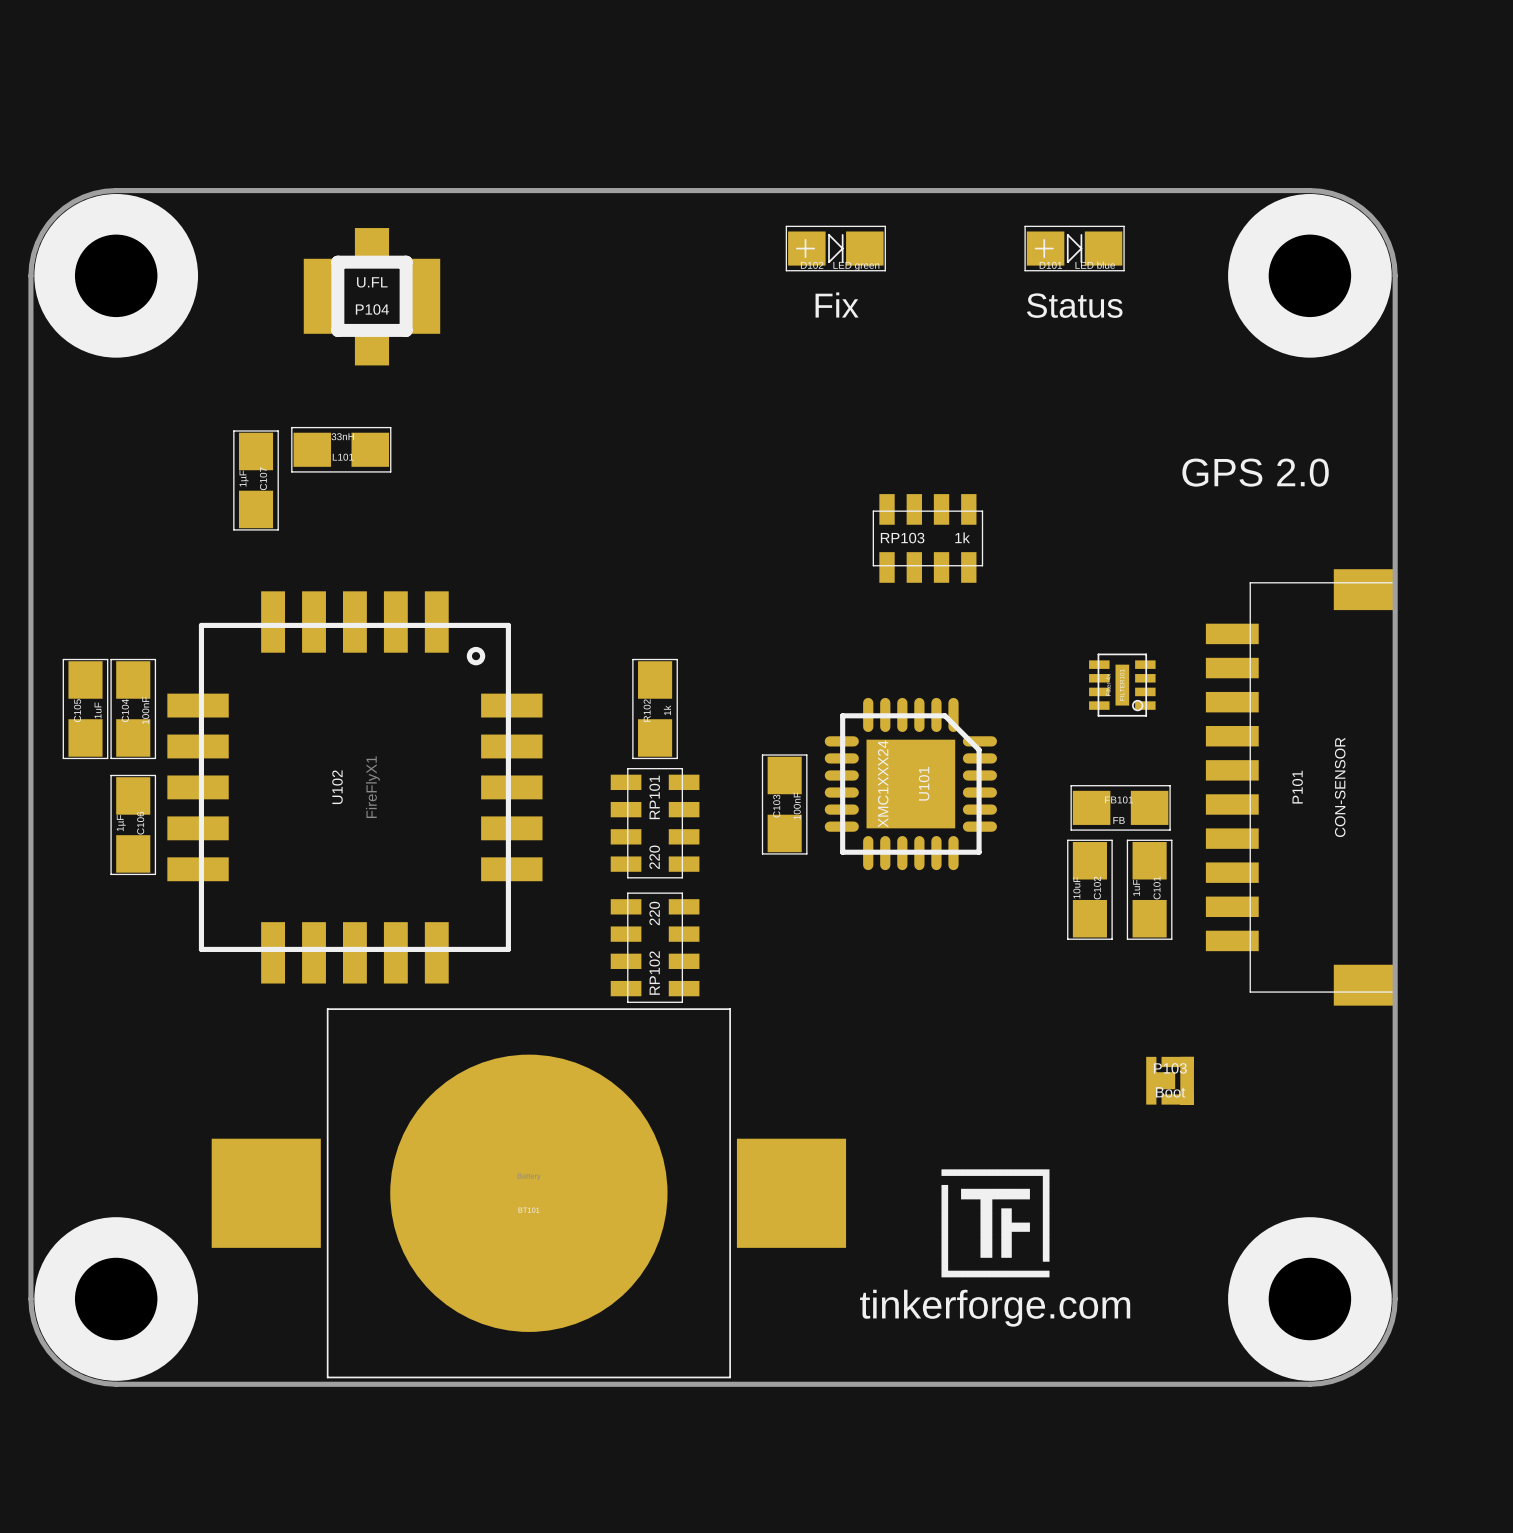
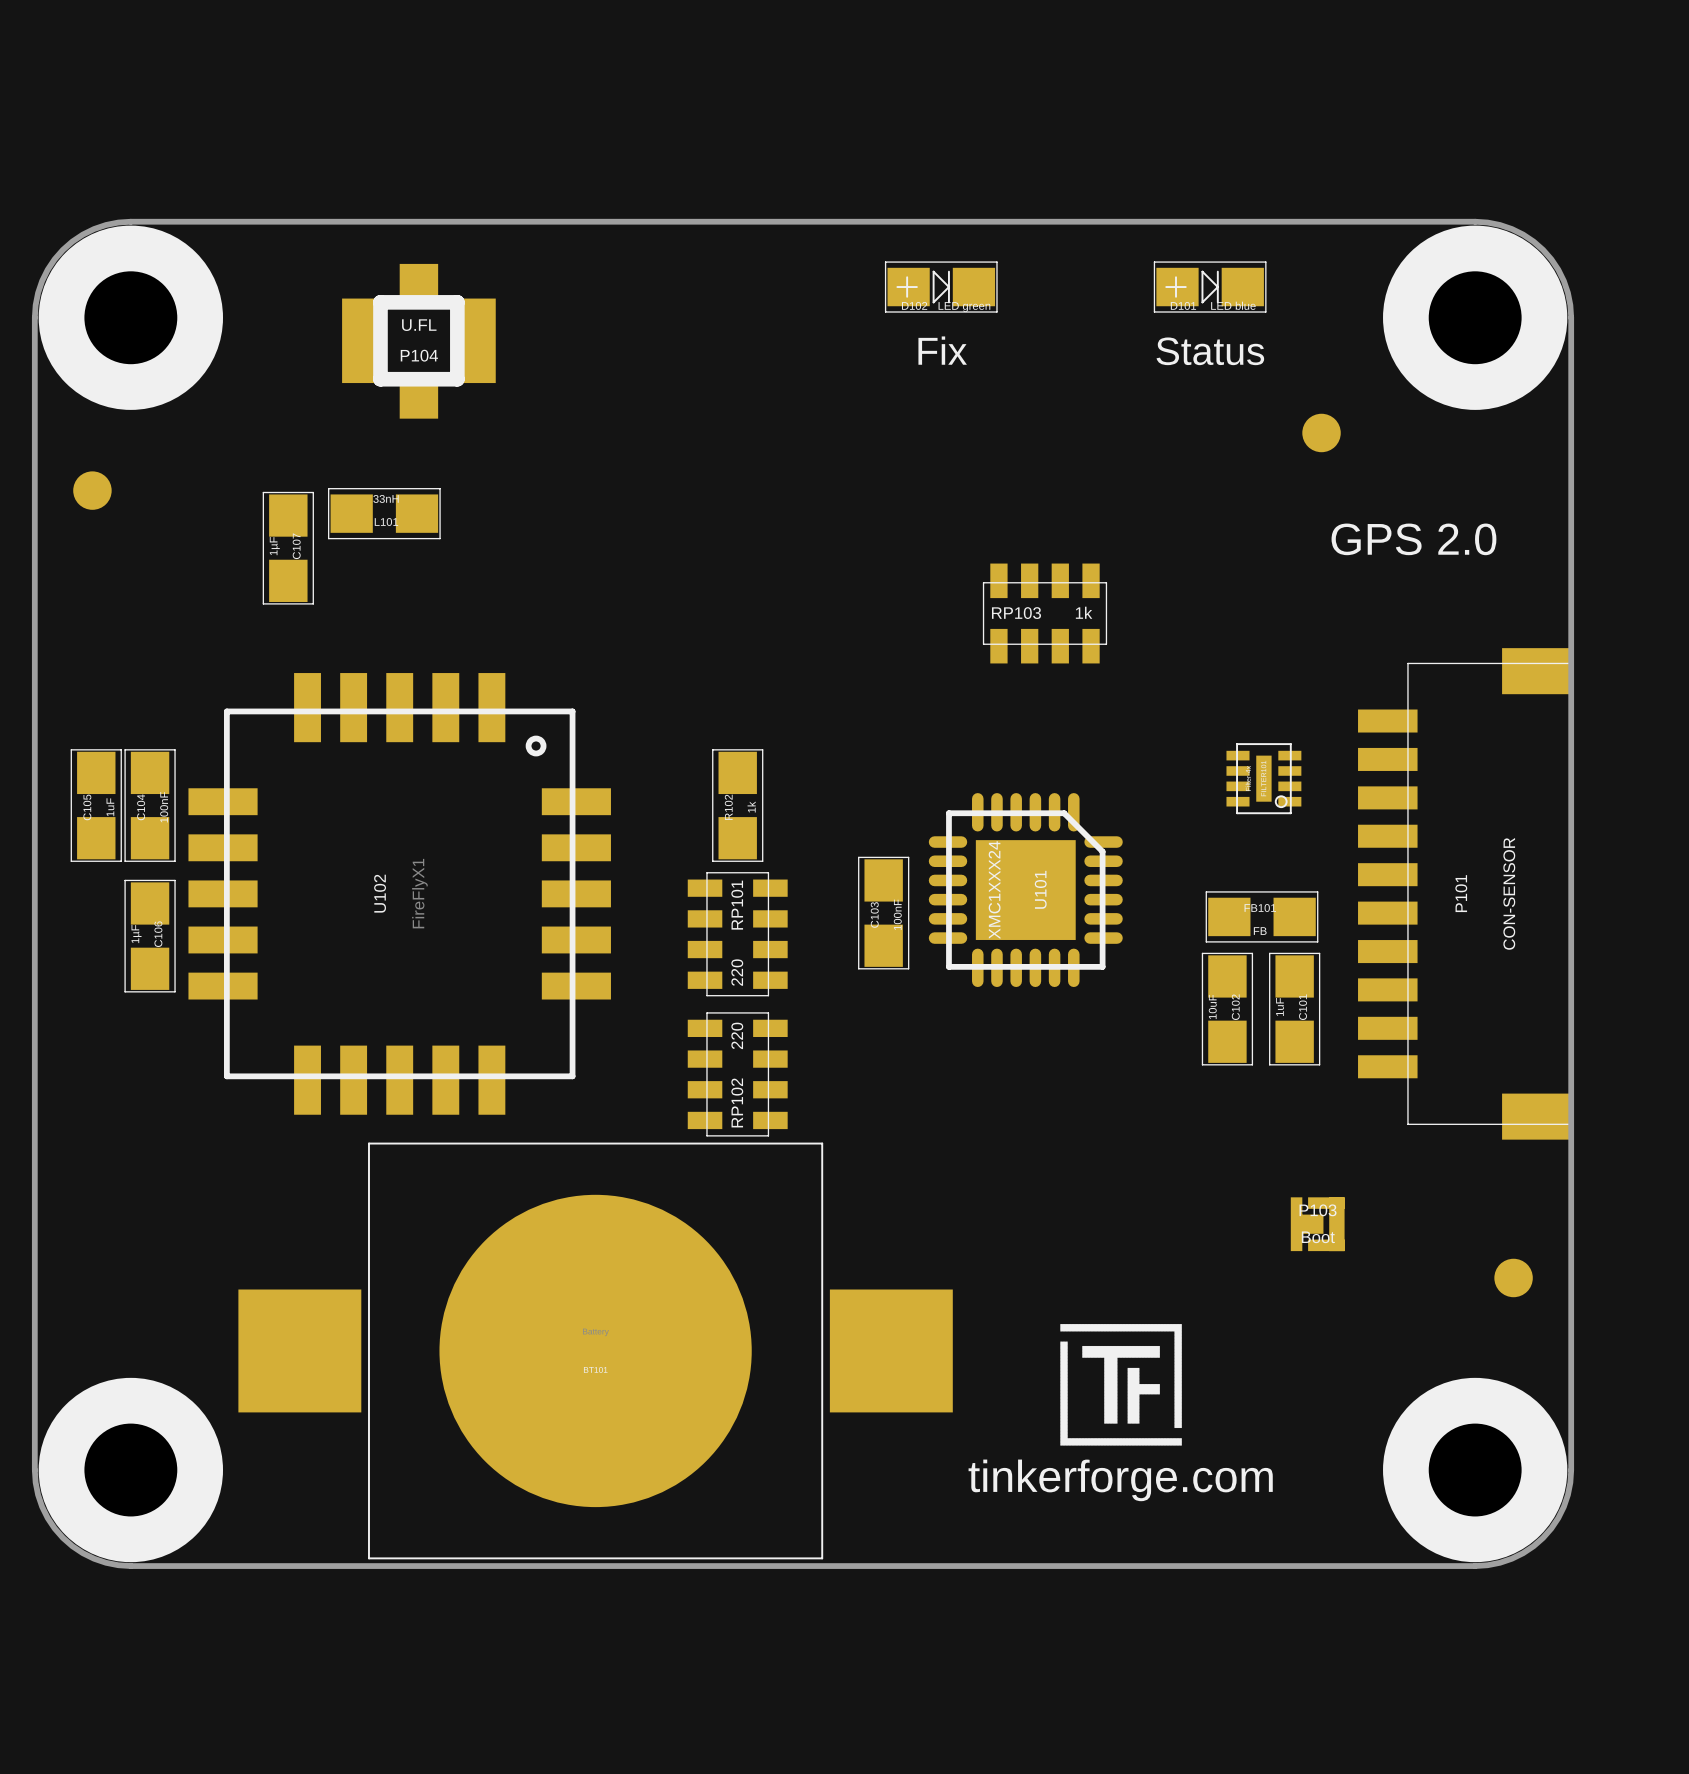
part: none -> (1321, 432)
part: none -> (92, 490)
part: none -> (1513, 1277)

